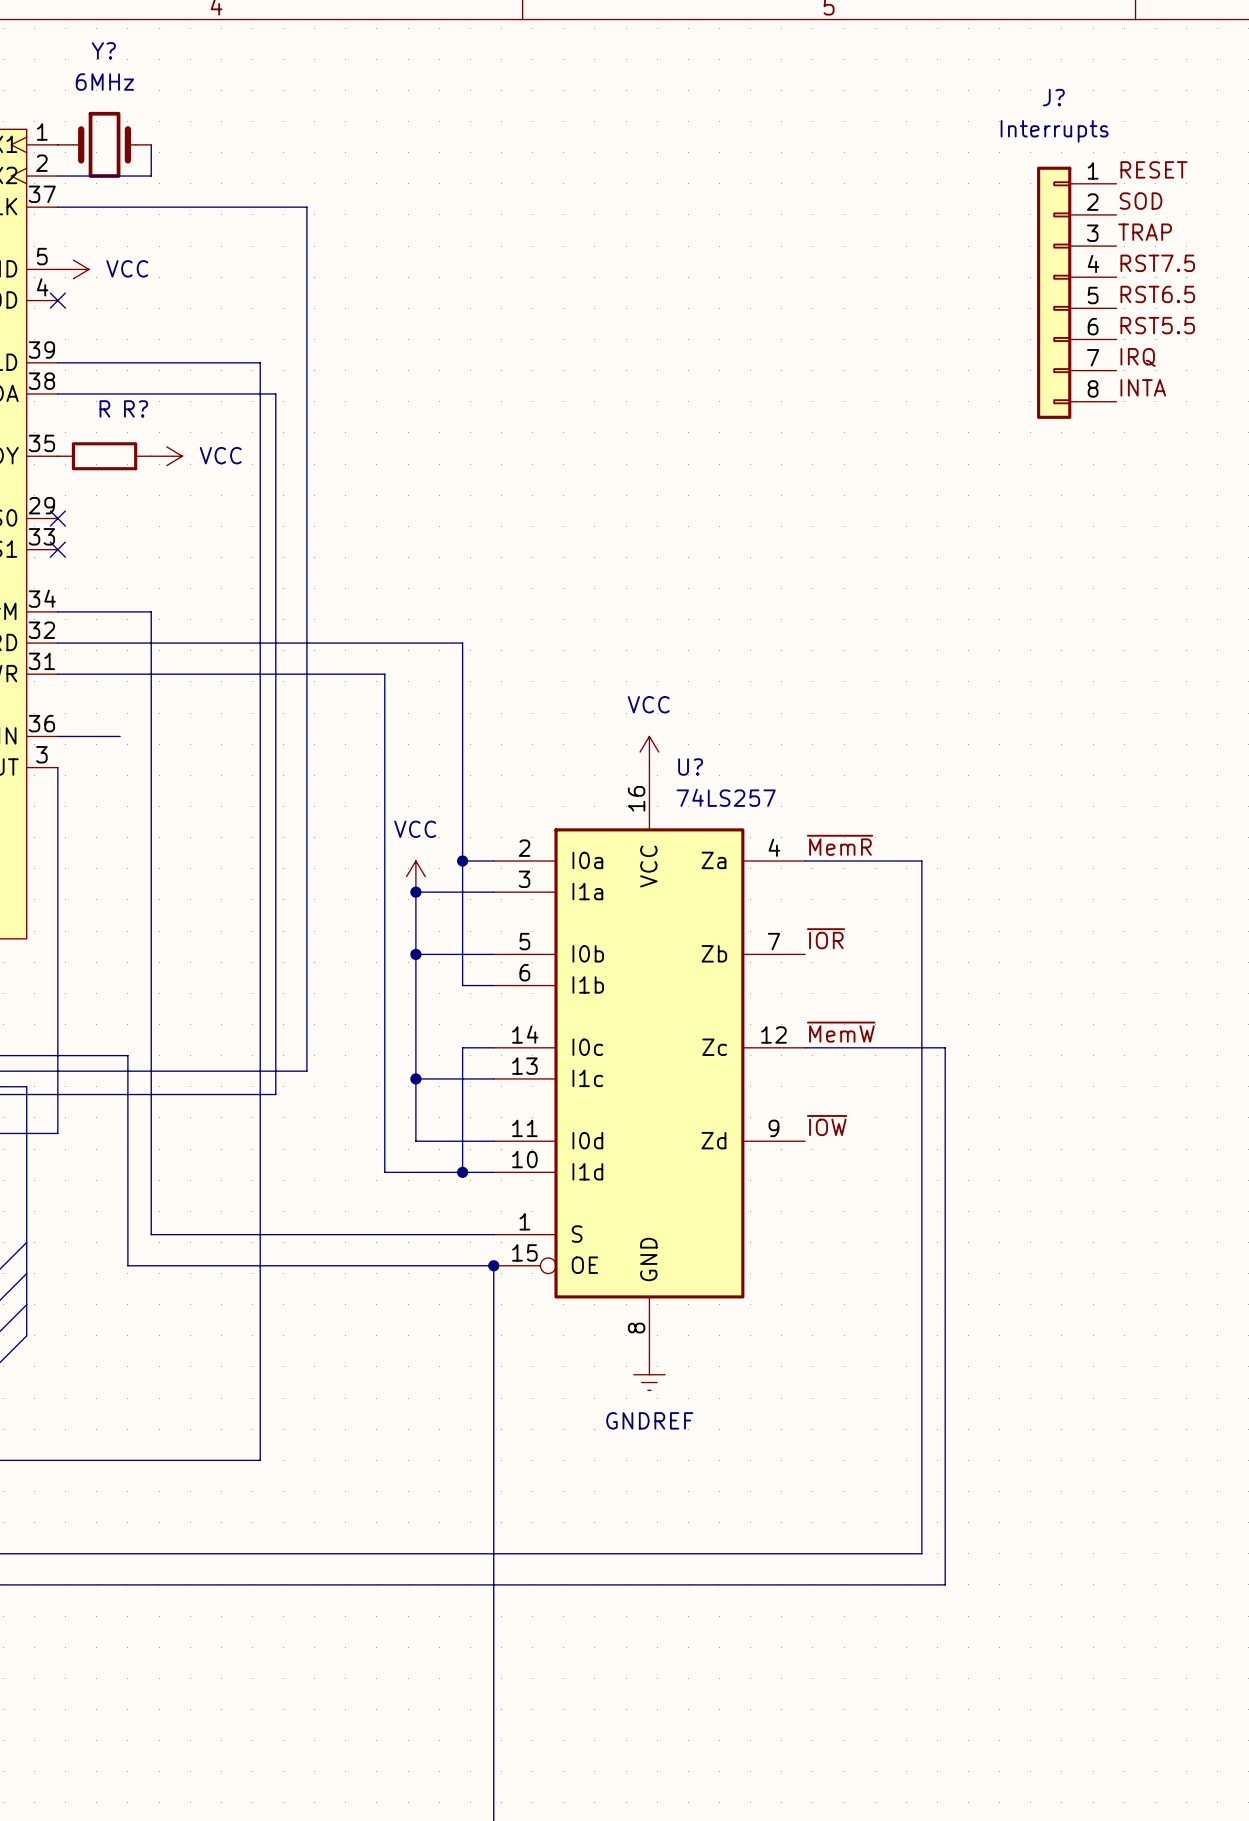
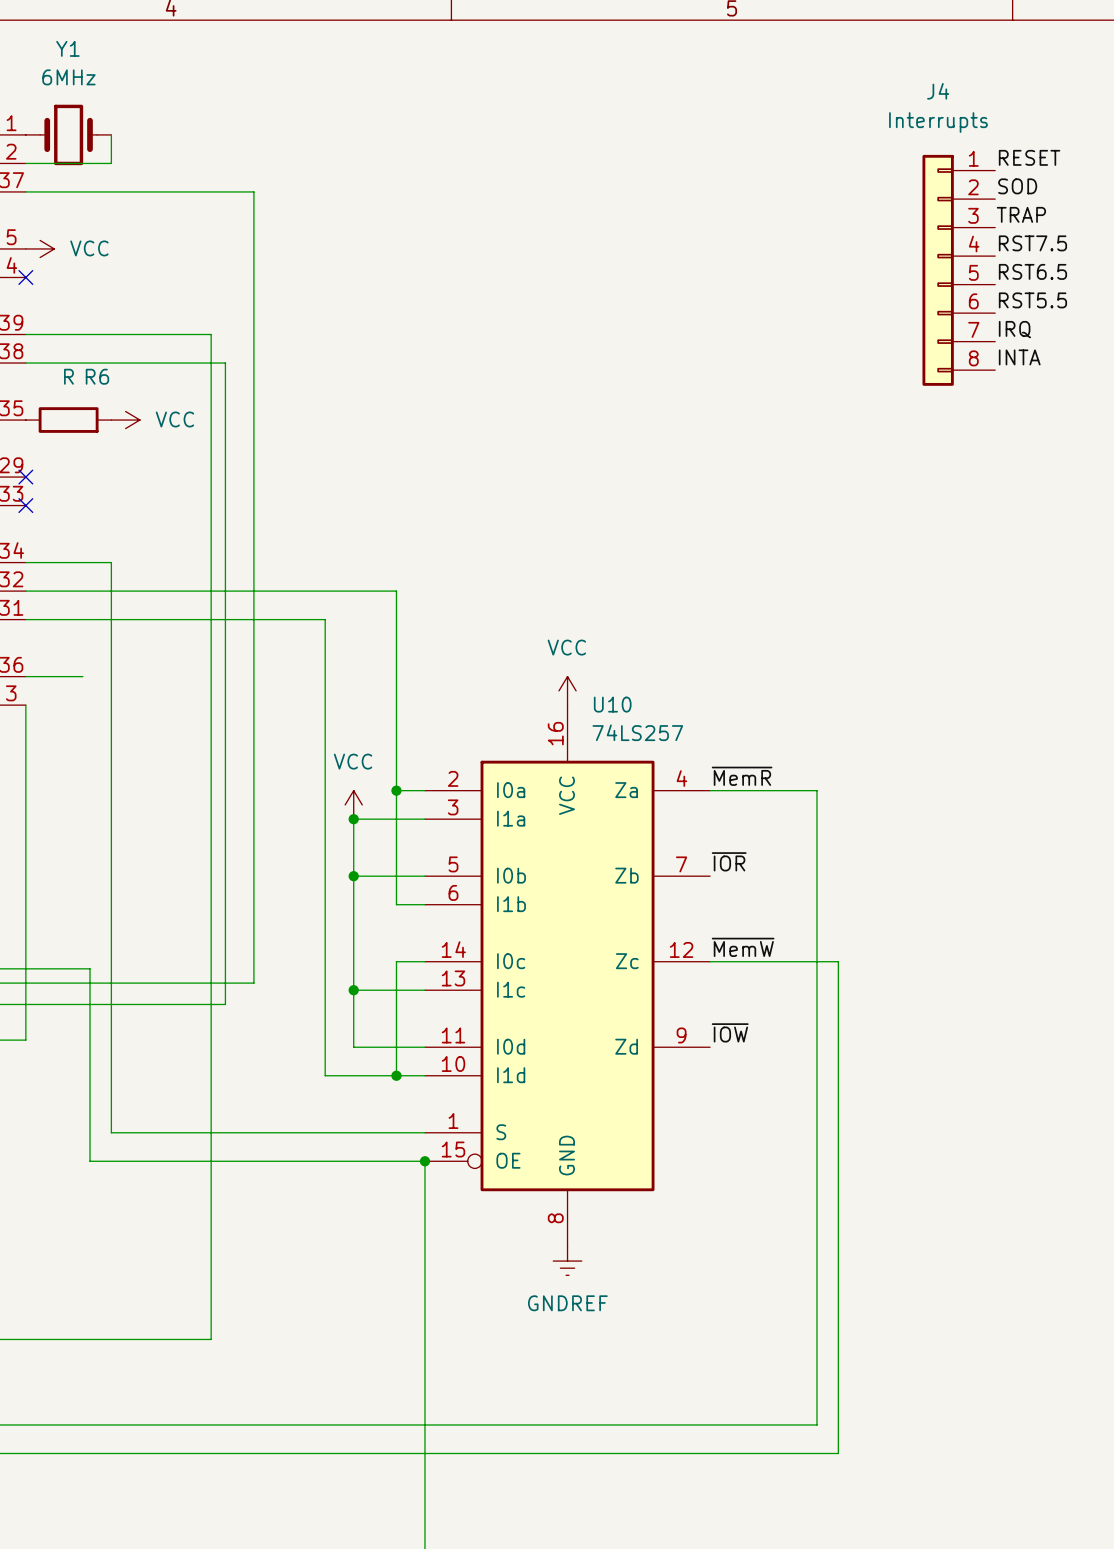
Y? name: Y? (103, 50) -> Y1 (67, 48)
J? name: J? (1053, 97) -> J4 (938, 91)
R? name: R? (136, 408) -> R6 (97, 376)
U? name: U? (690, 767) -> U10 (612, 704)

